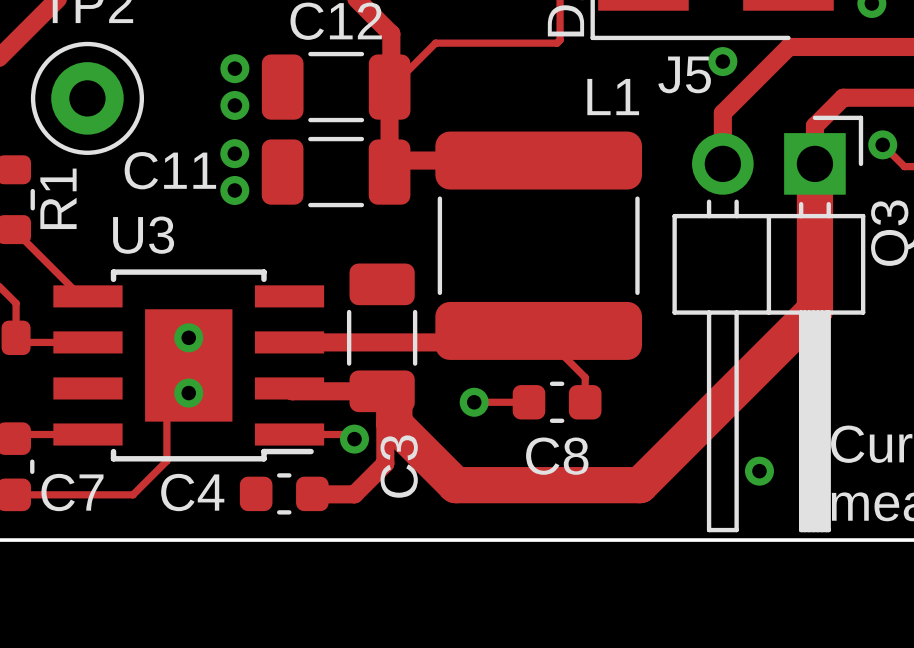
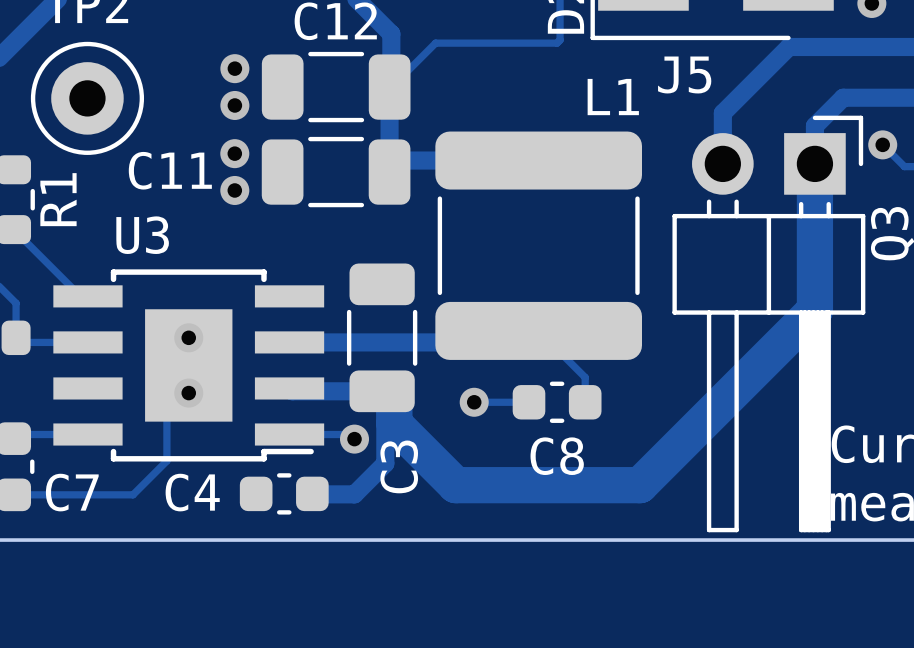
via: (722, 61) -> none
via: (759, 471) -> none

